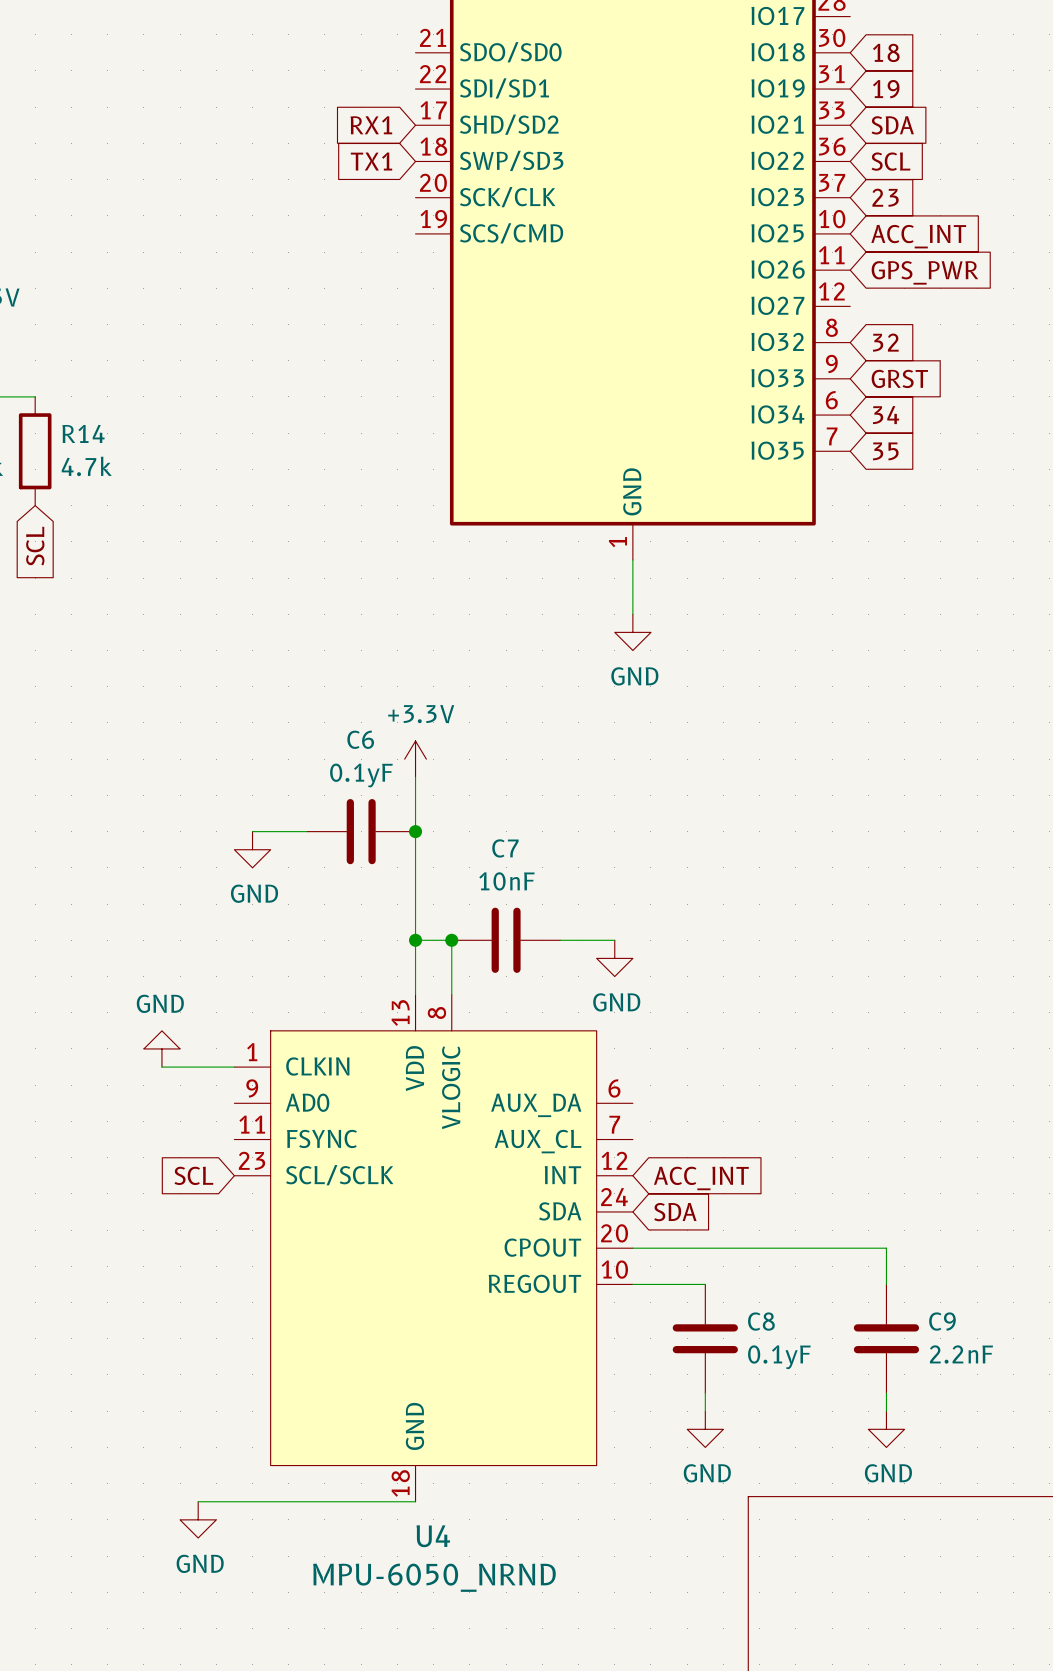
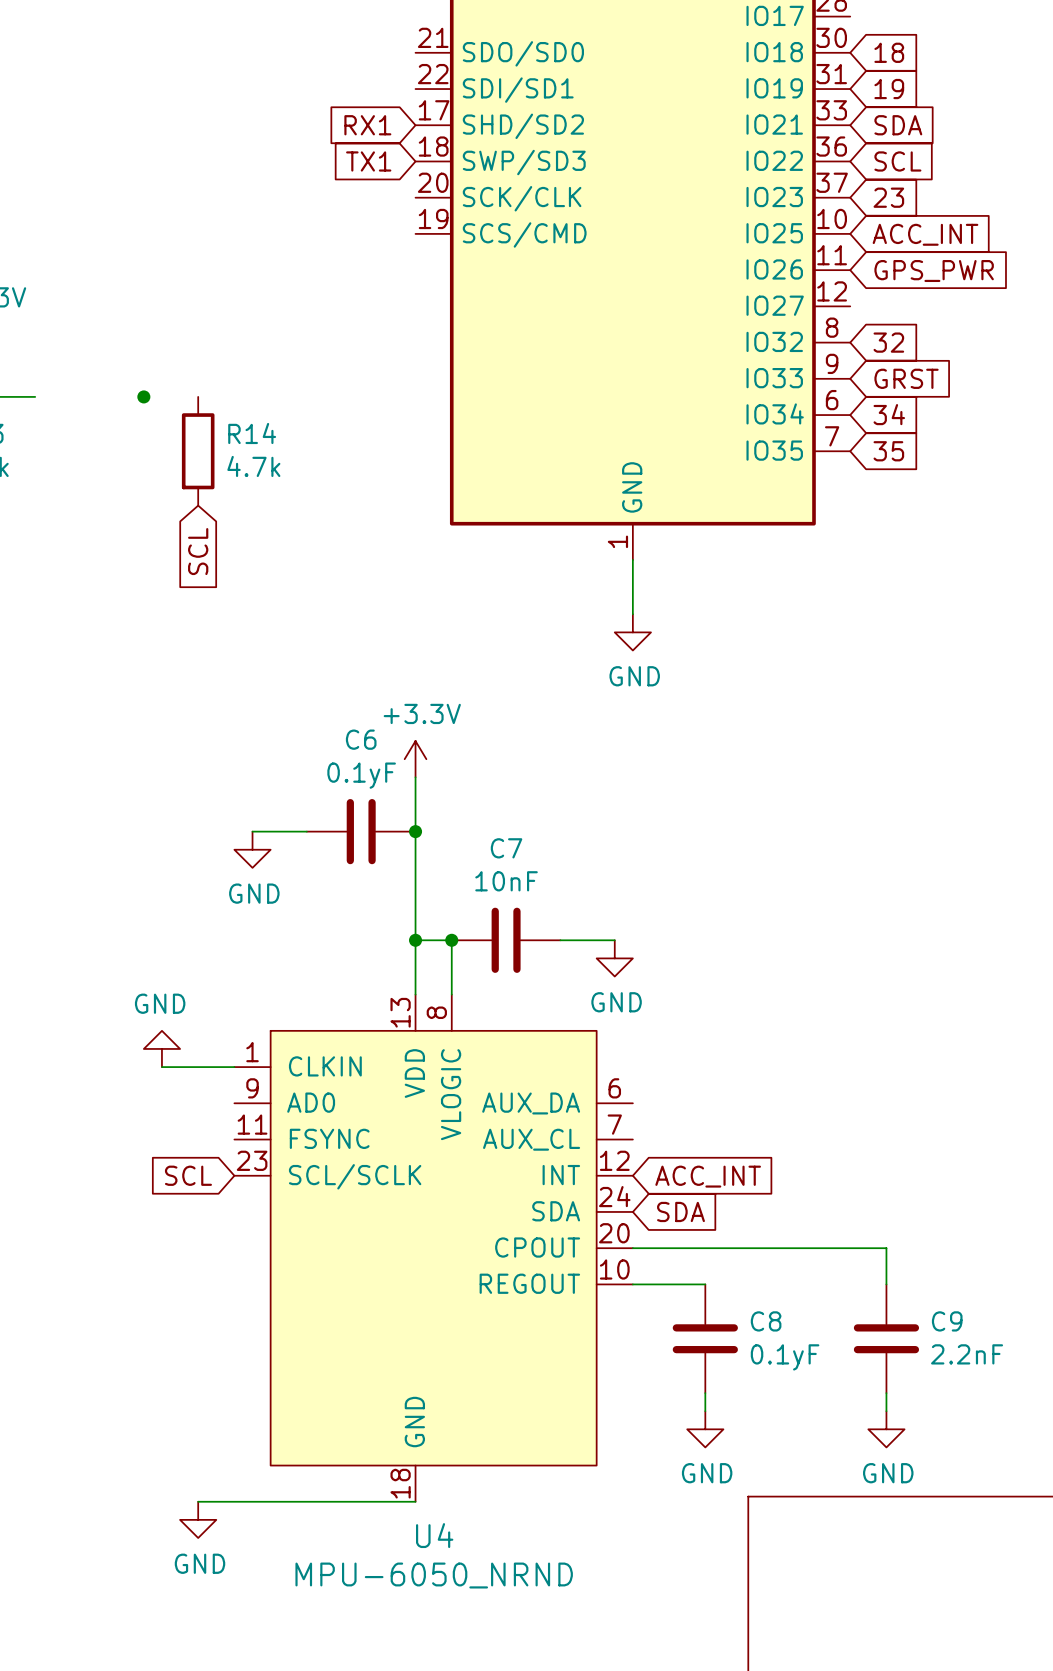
junction: none -> (143, 396)
R14 position: (35, 451) -> (198, 451)
global label position: SCL (35, 546) -> SCL (198, 551)

